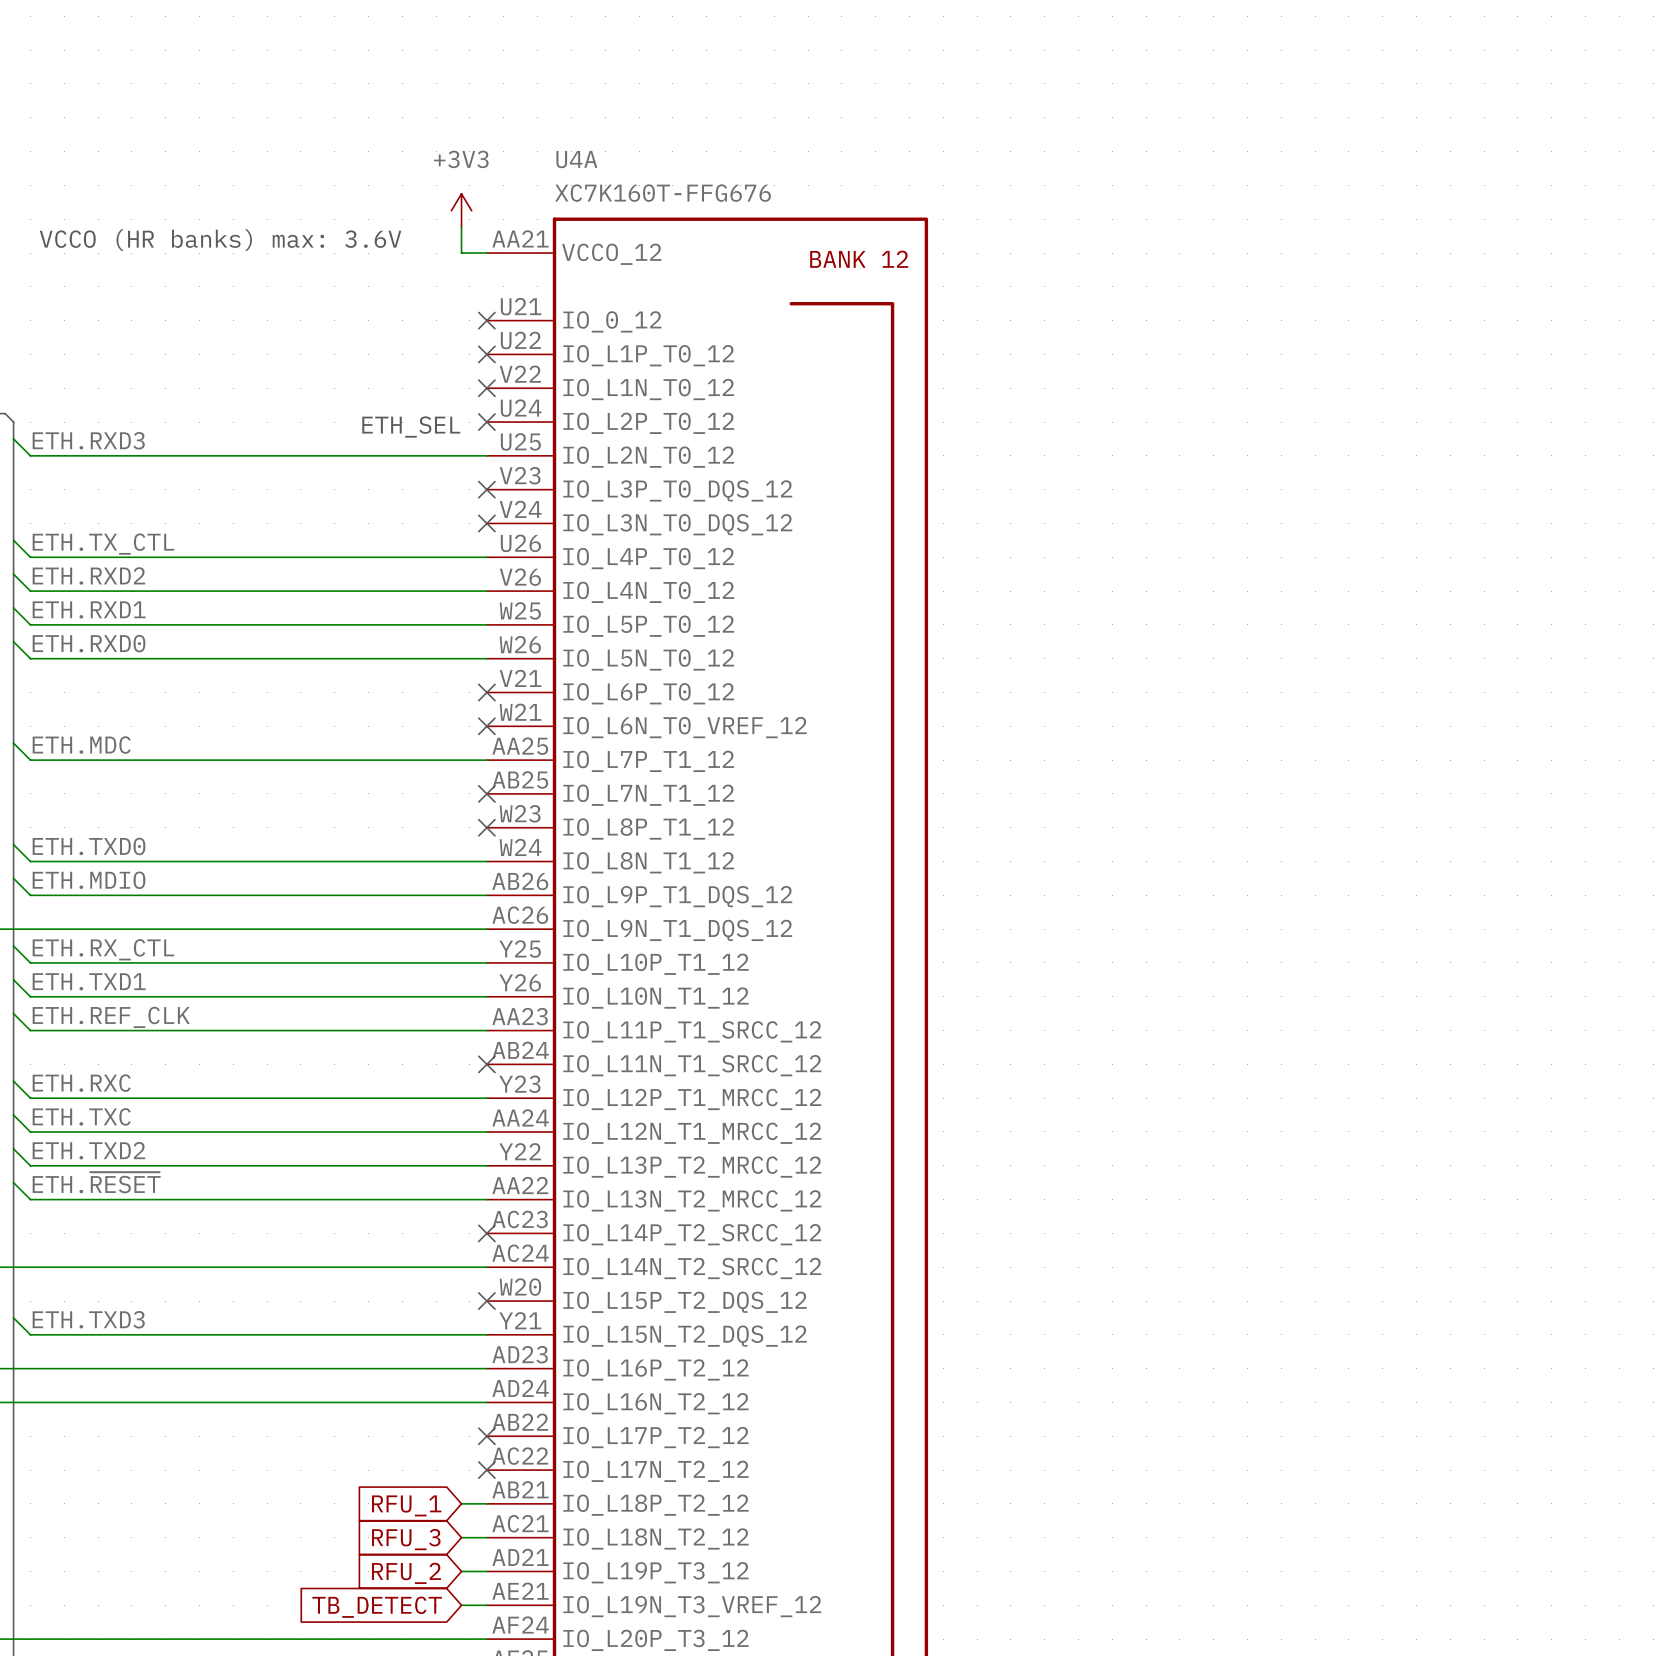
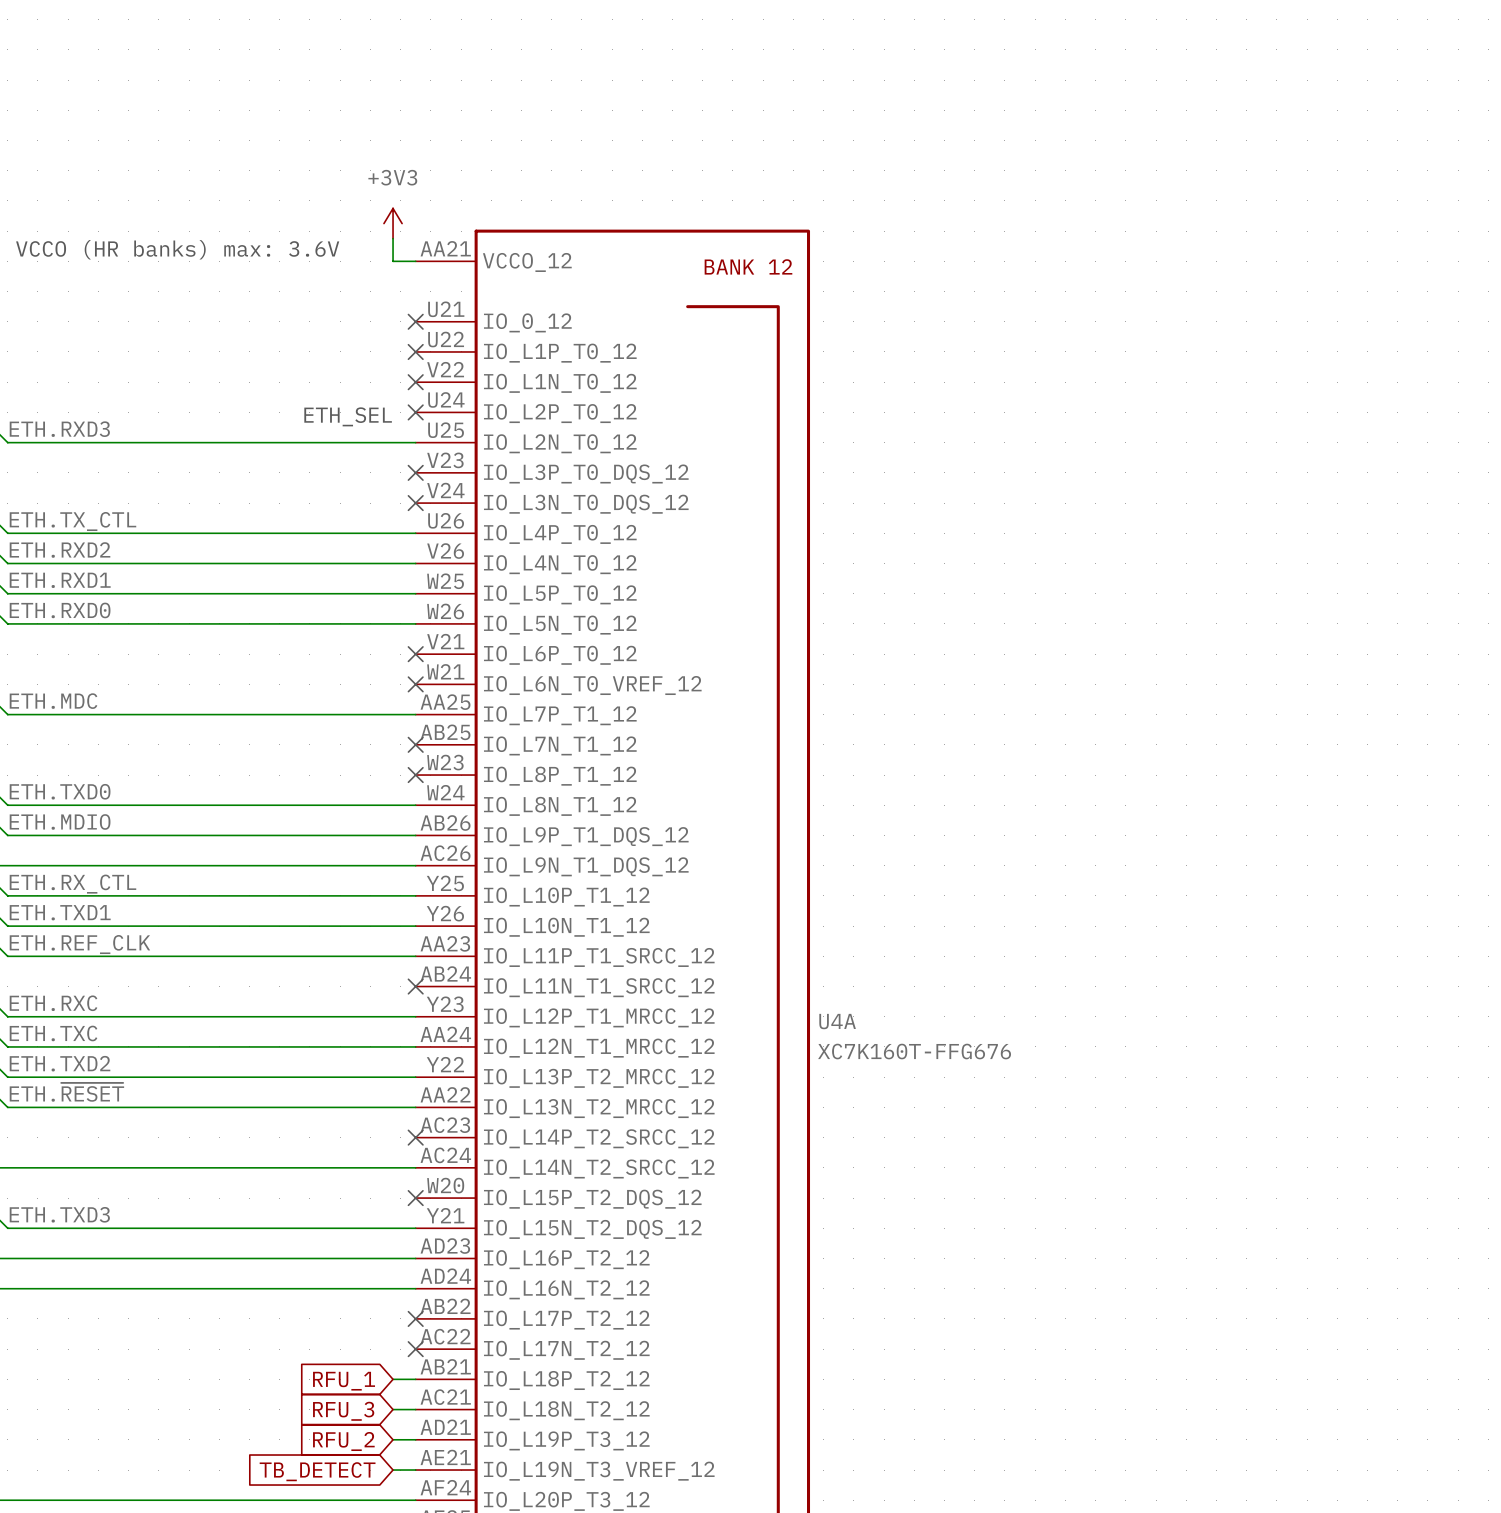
U4A name position: U4A (576, 159) -> U4A (837, 1021)
U4A value position: XC7K160T-FFG676 (663, 193) -> XC7K160T-FFG676 (914, 1051)

